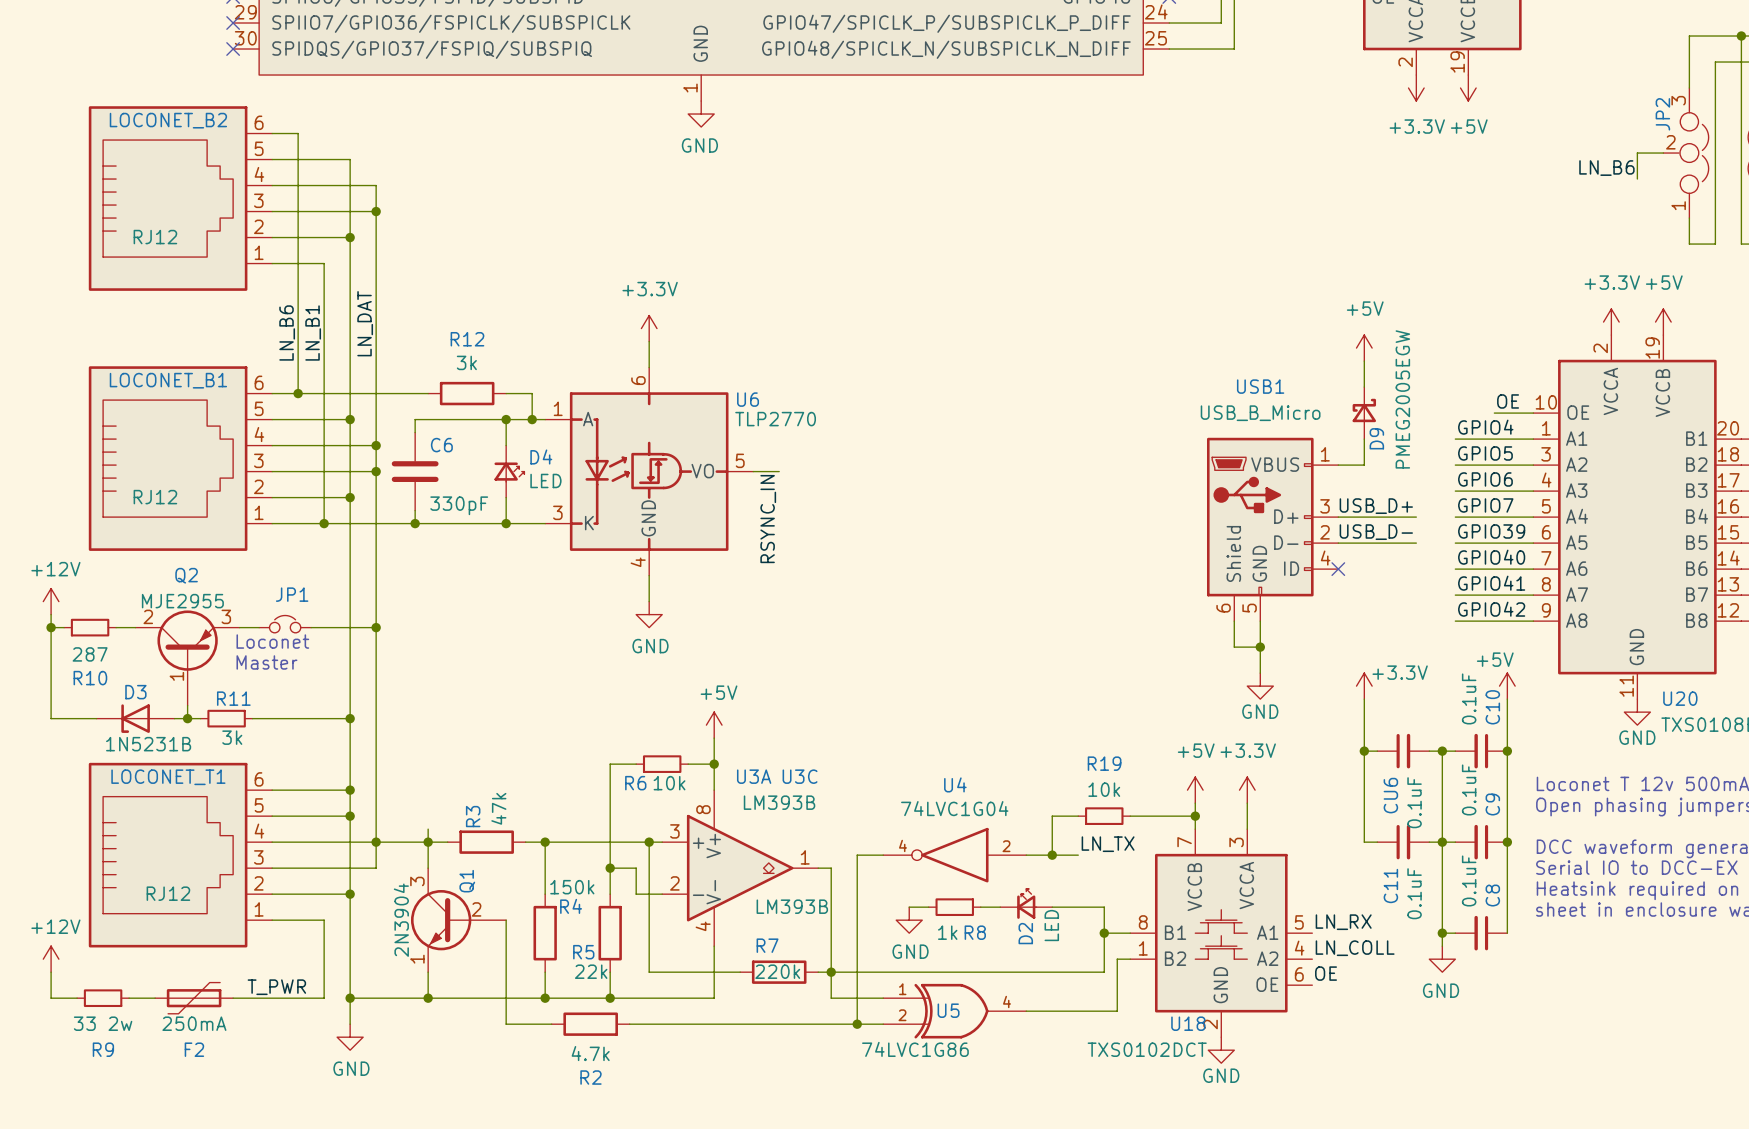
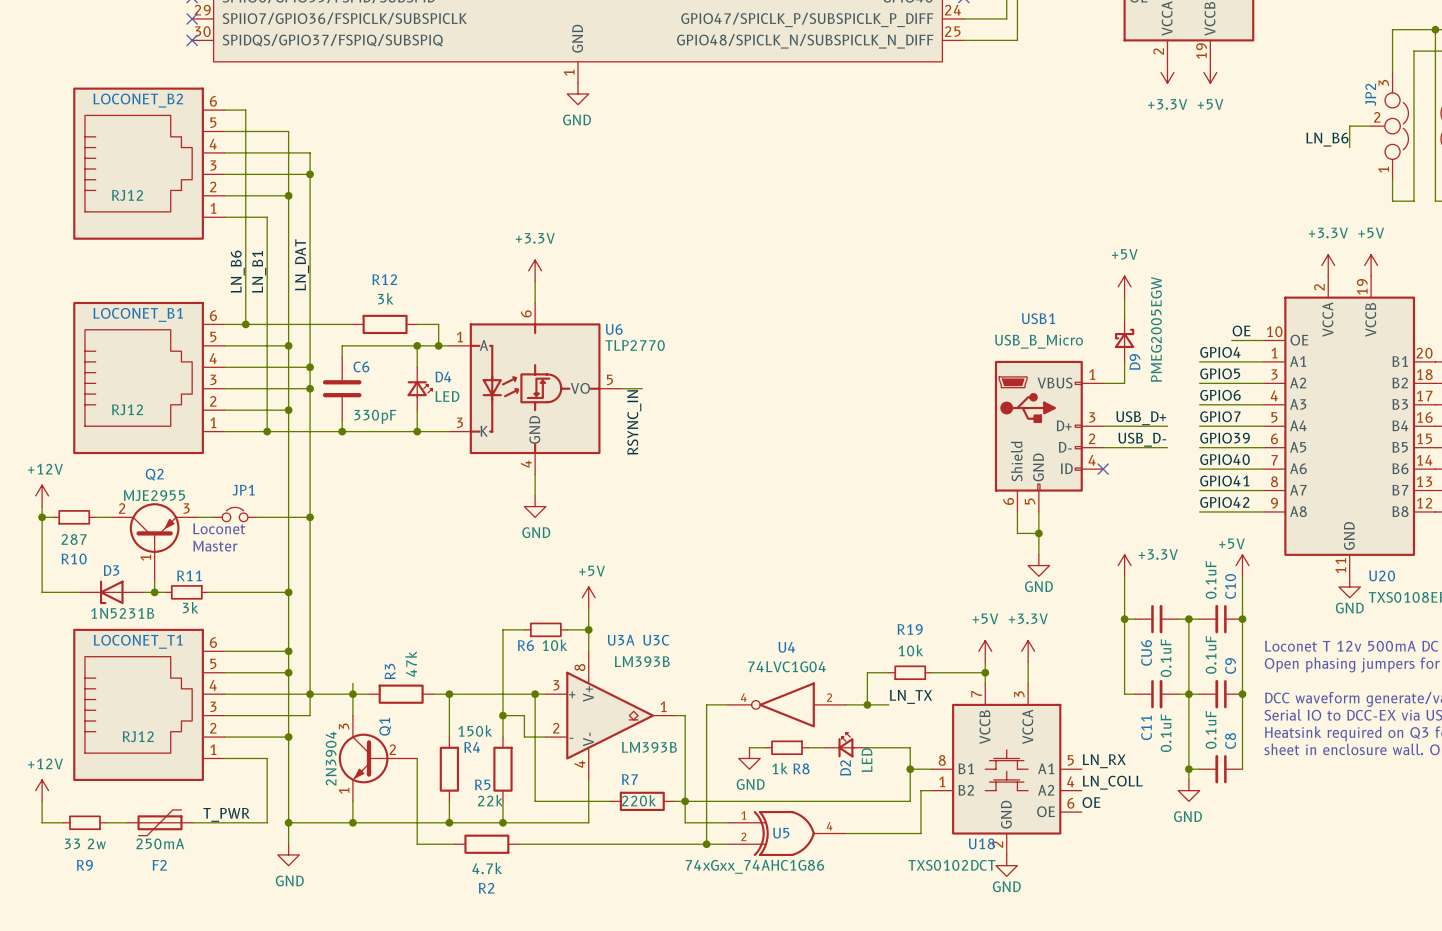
U5 value: 74LVC1G86 (915, 1049) -> 74xGxx_74AHC1G86 (754, 866)

